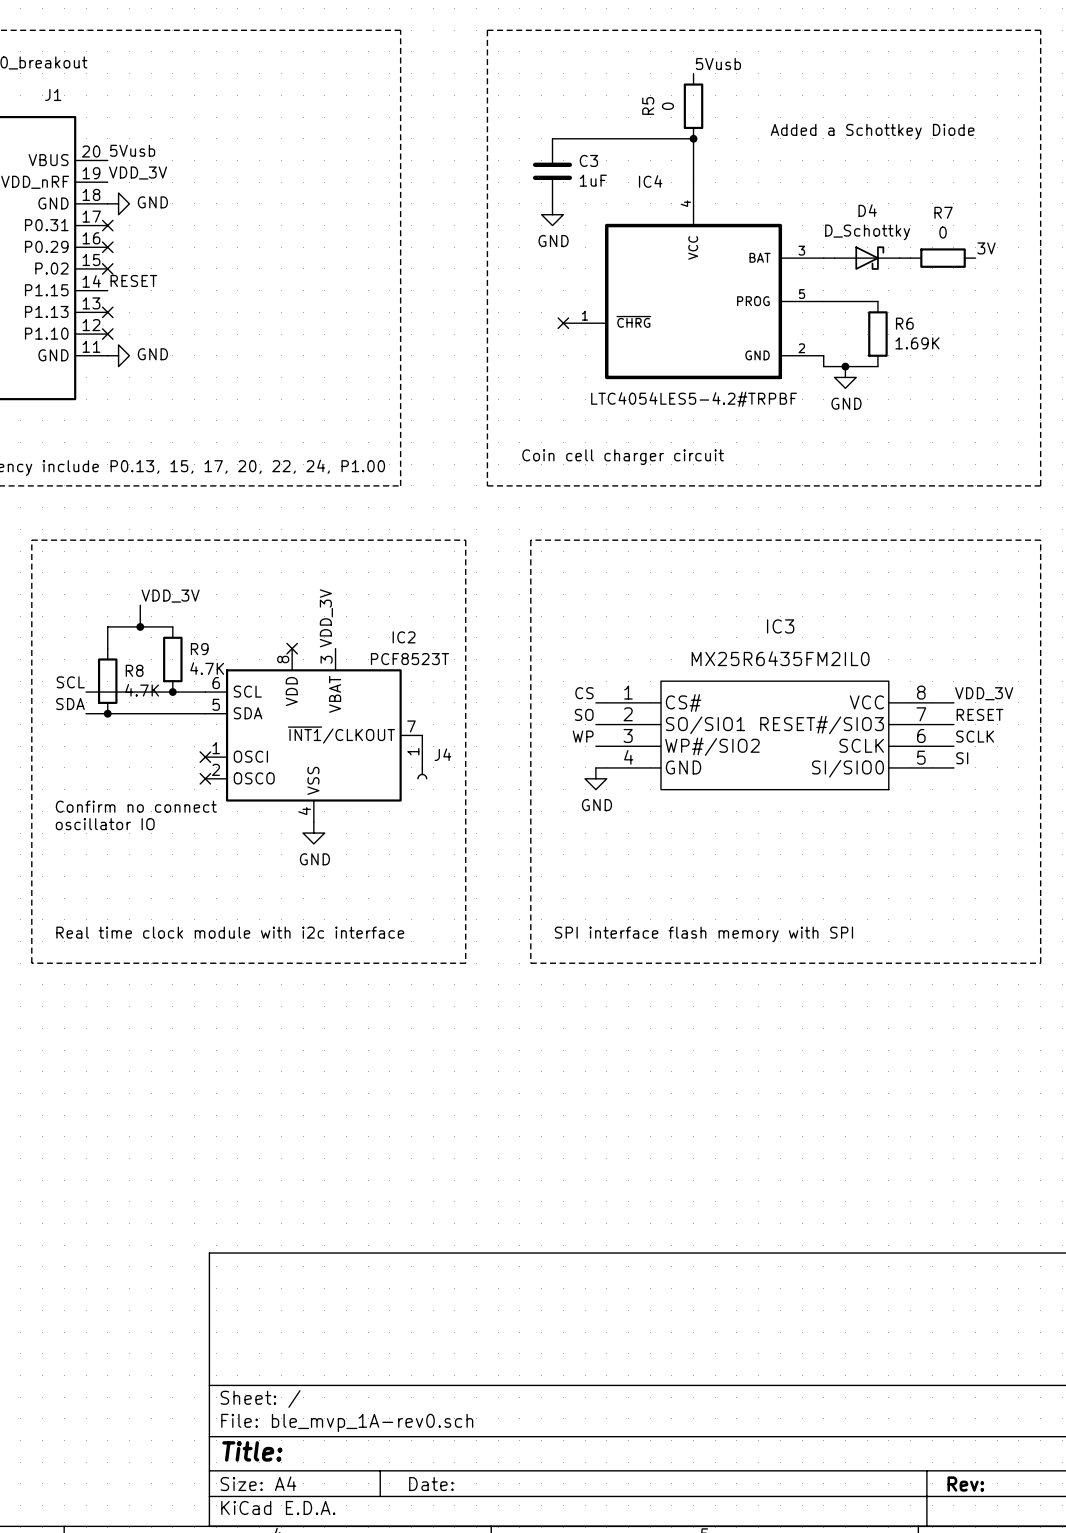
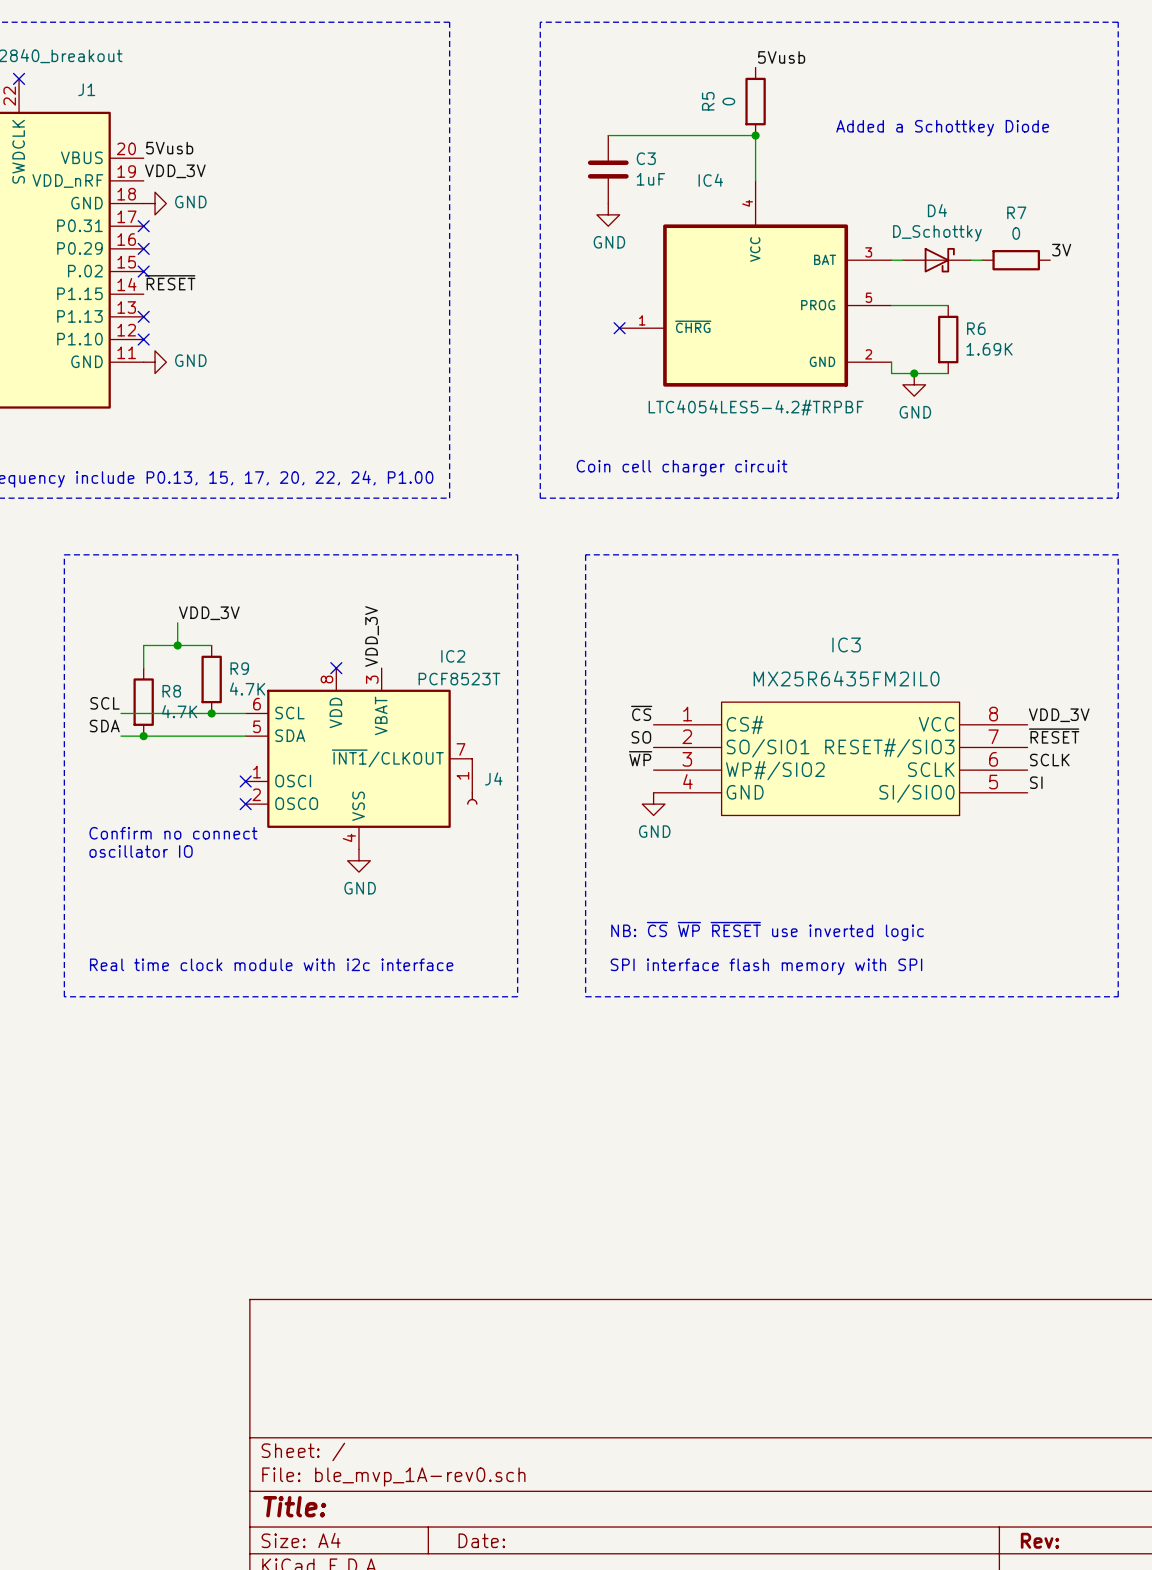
label: RESET (133, 280) -> ~{RESET} (170, 282)
label: CS (584, 693) -> ~{CS} (641, 713)
label: RESET (980, 714) -> ~{RESET} (1054, 736)
label: WP (583, 736) -> ~{WP} (640, 758)
text: none -> NB: ~{CS} ~{WP} ~{RESET} use inverted logic (767, 931)

